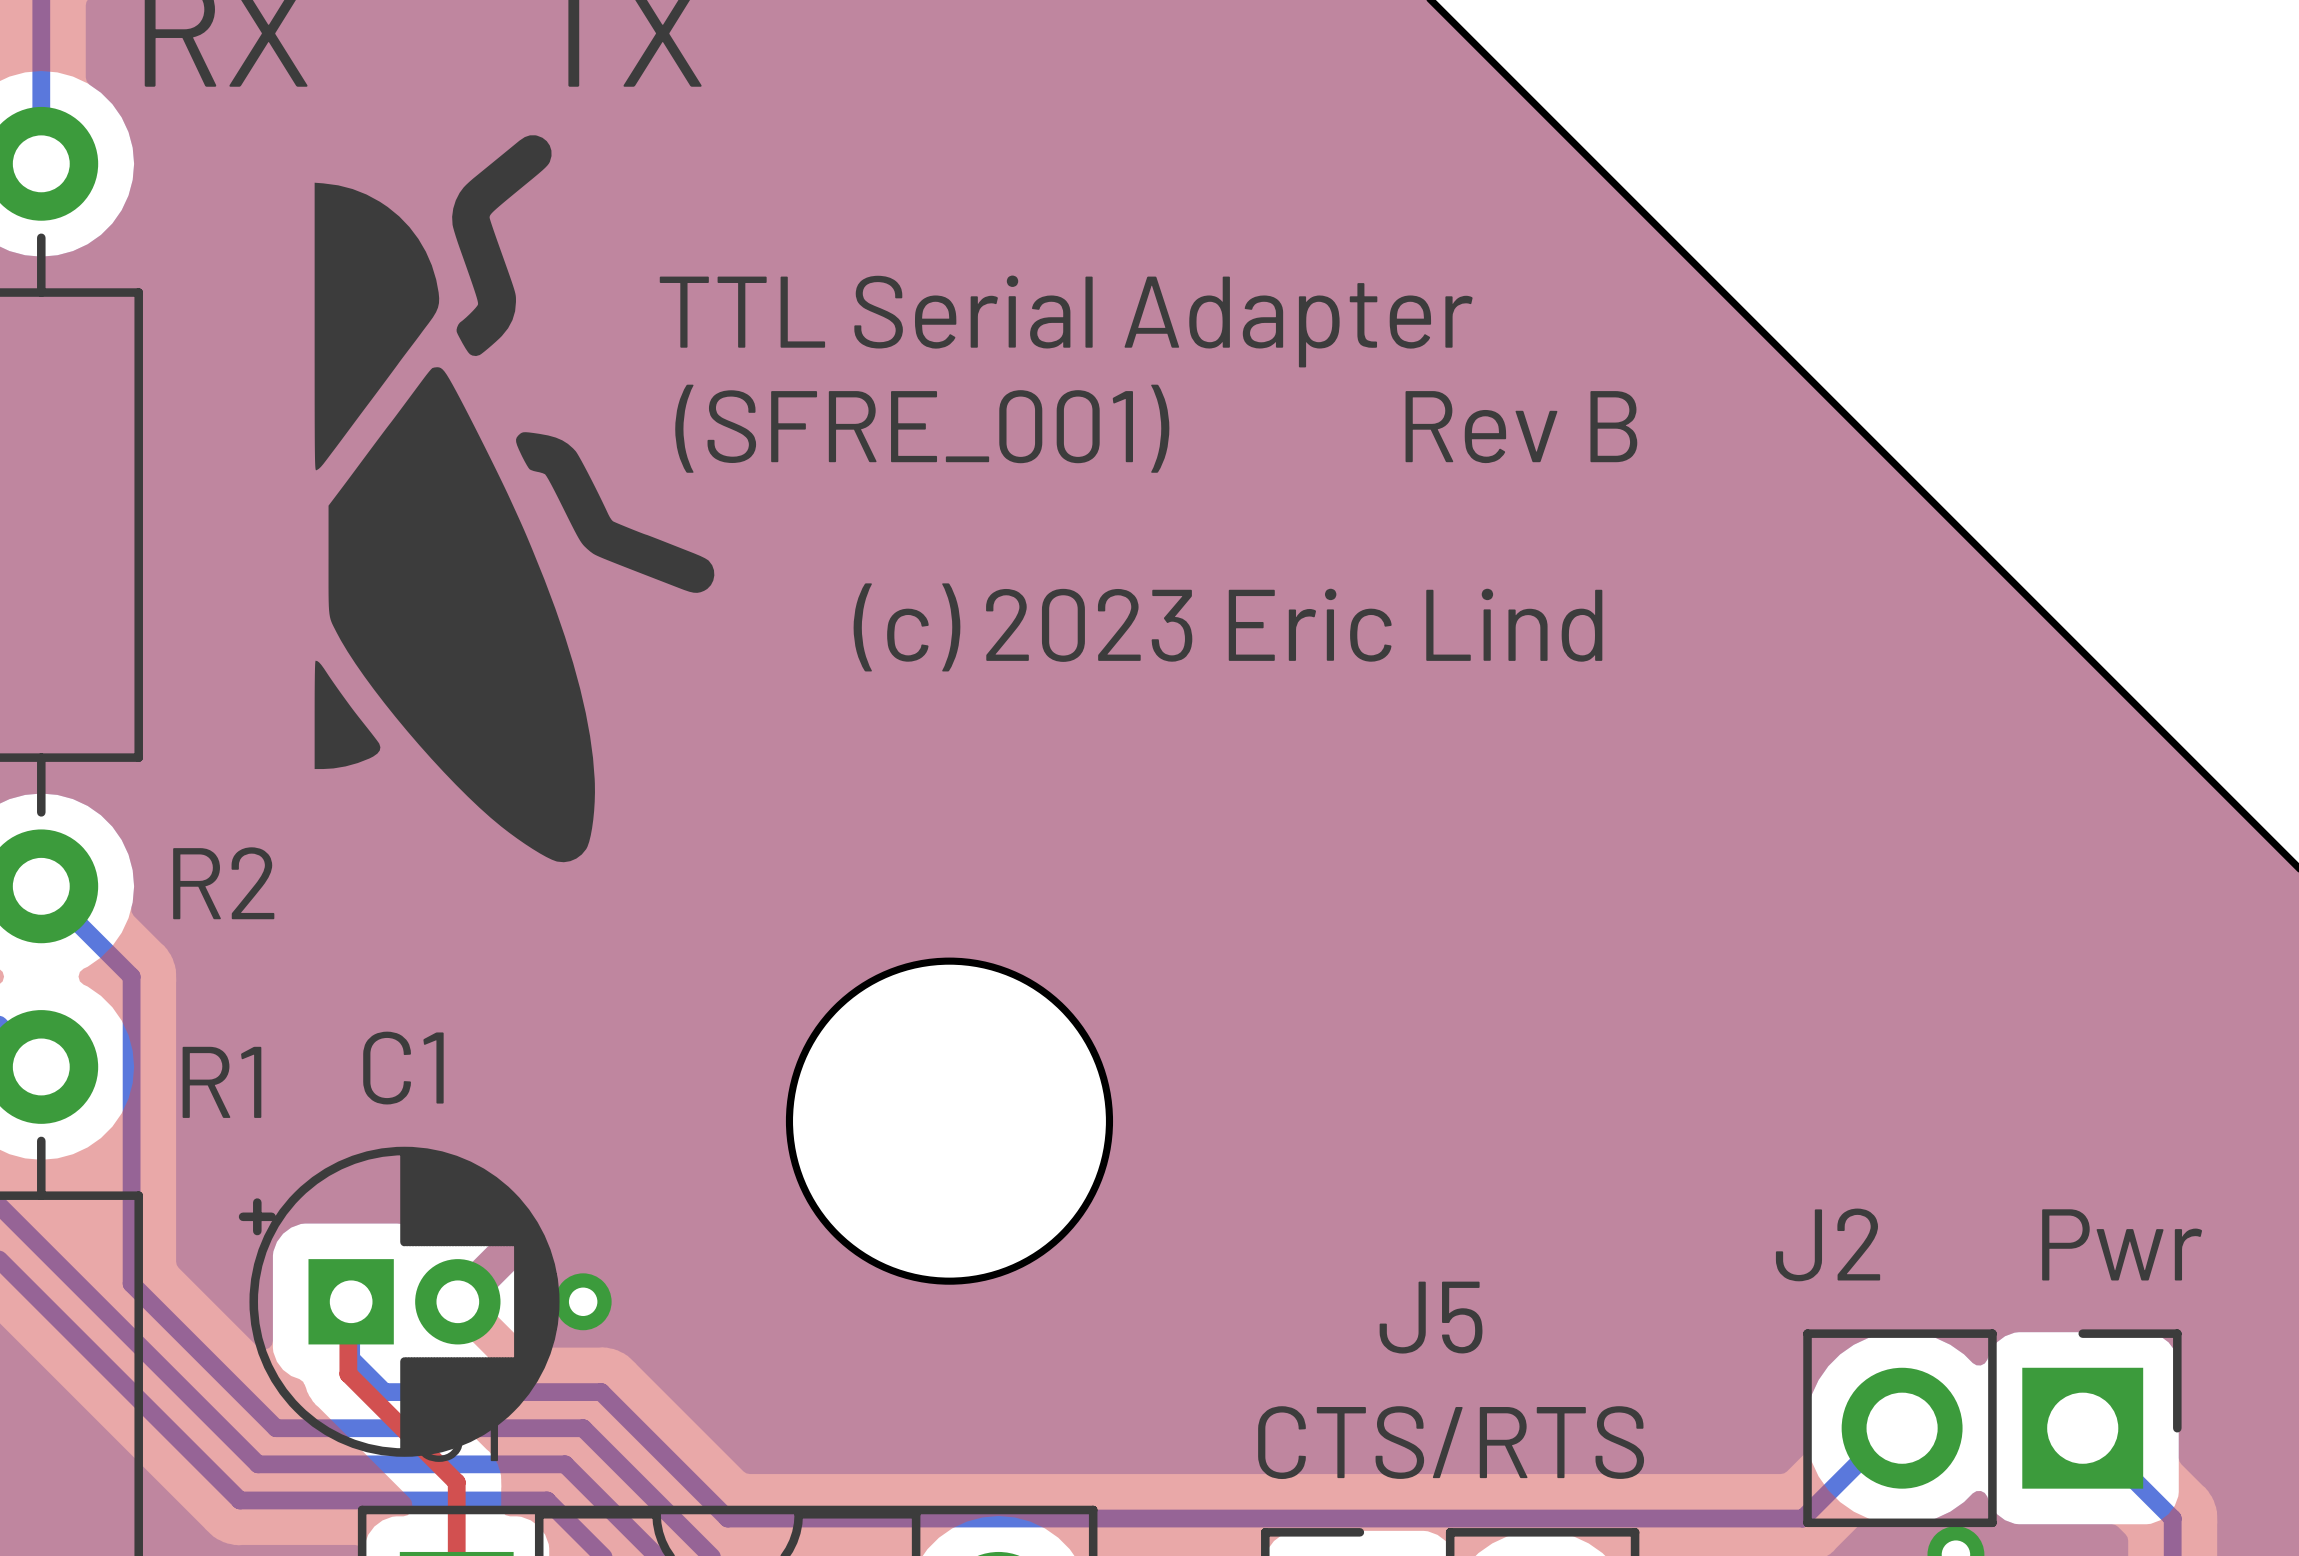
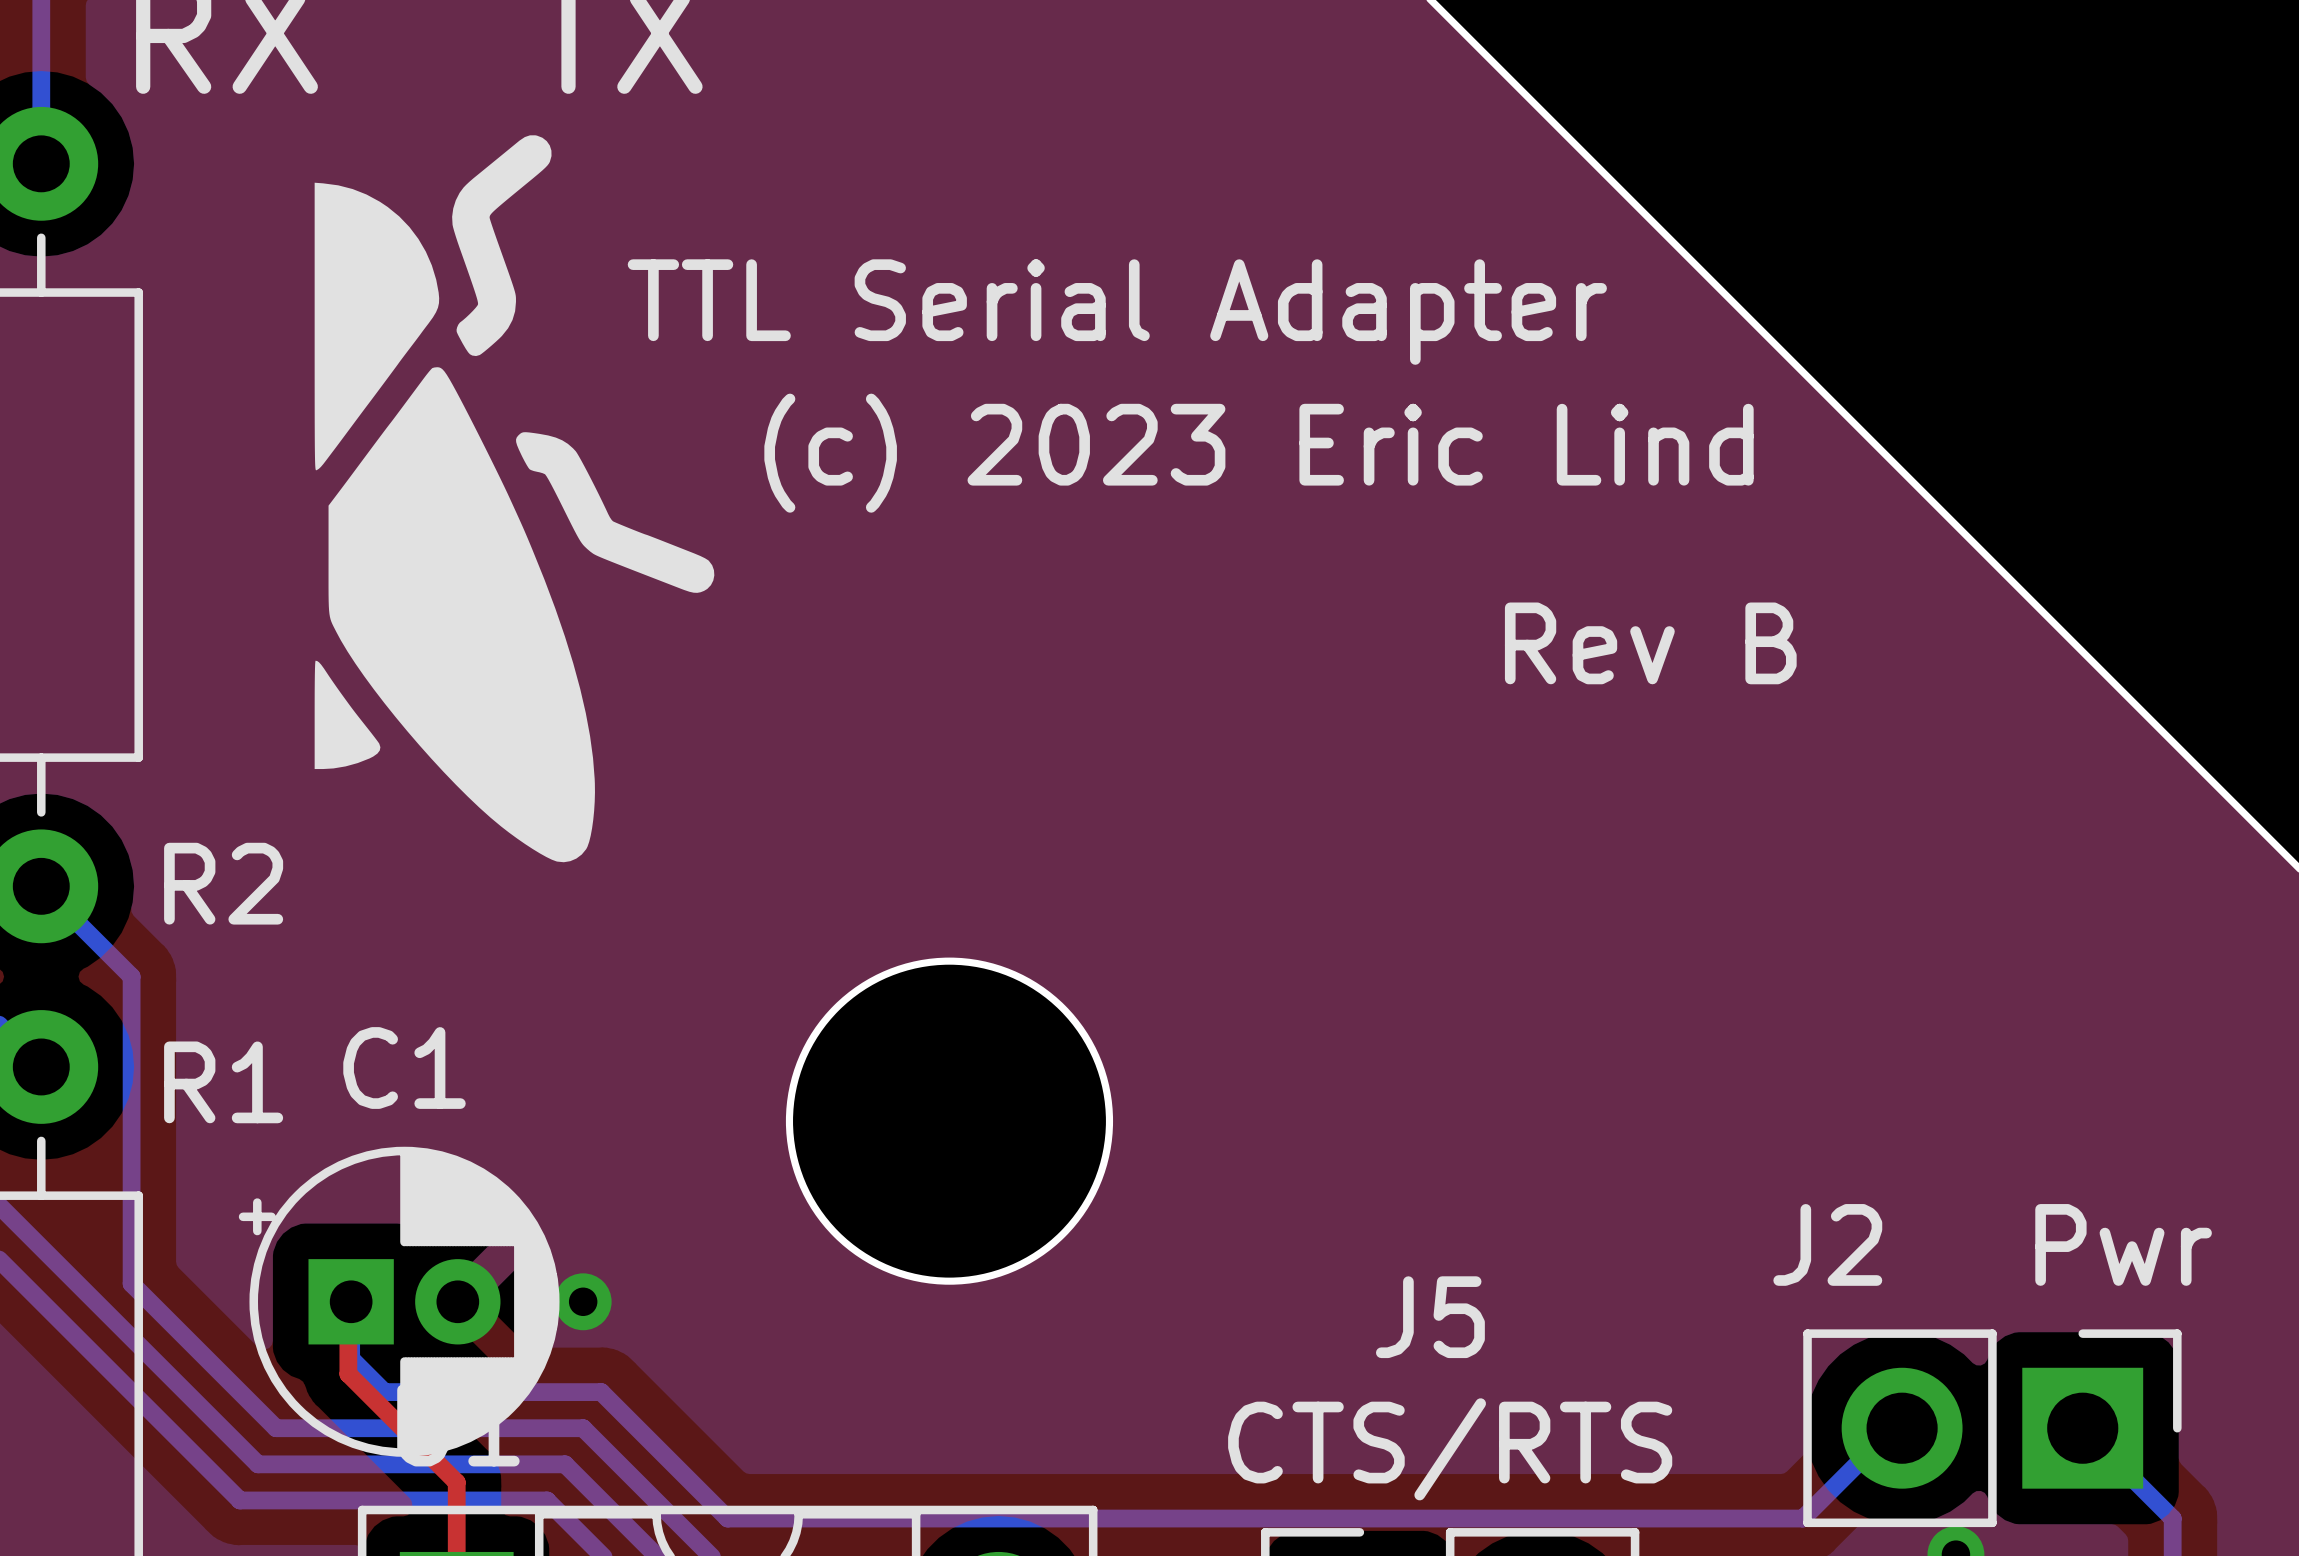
text position: TTL Serial Adapter (1066, 321) -> TTL Serial Adapter (1117, 312)
text position: Rev B (1521, 427) -> Rev B (1650, 643)
text: (SFRE_001) (922, 428) -> none
text position: (c) 2023 Eric Lind (1227, 627) -> (c) 2023 Eric Lind (1259, 453)

